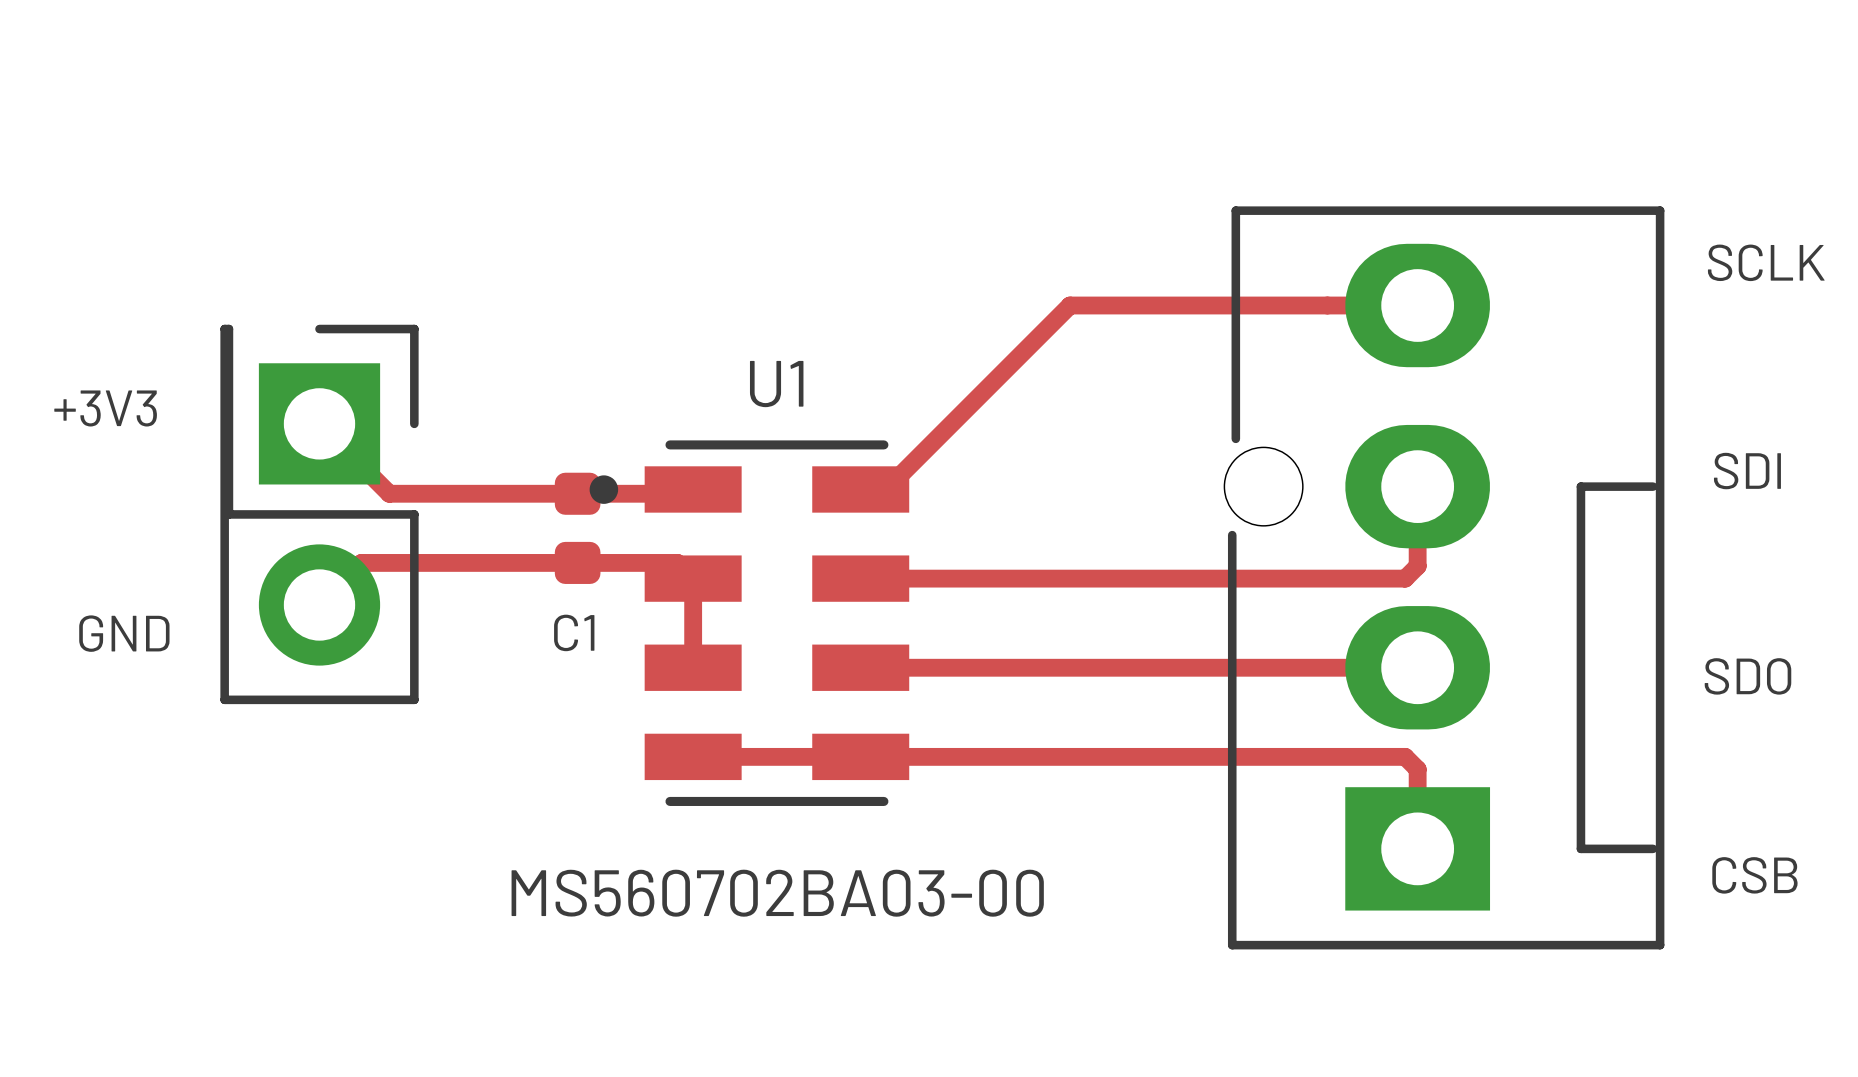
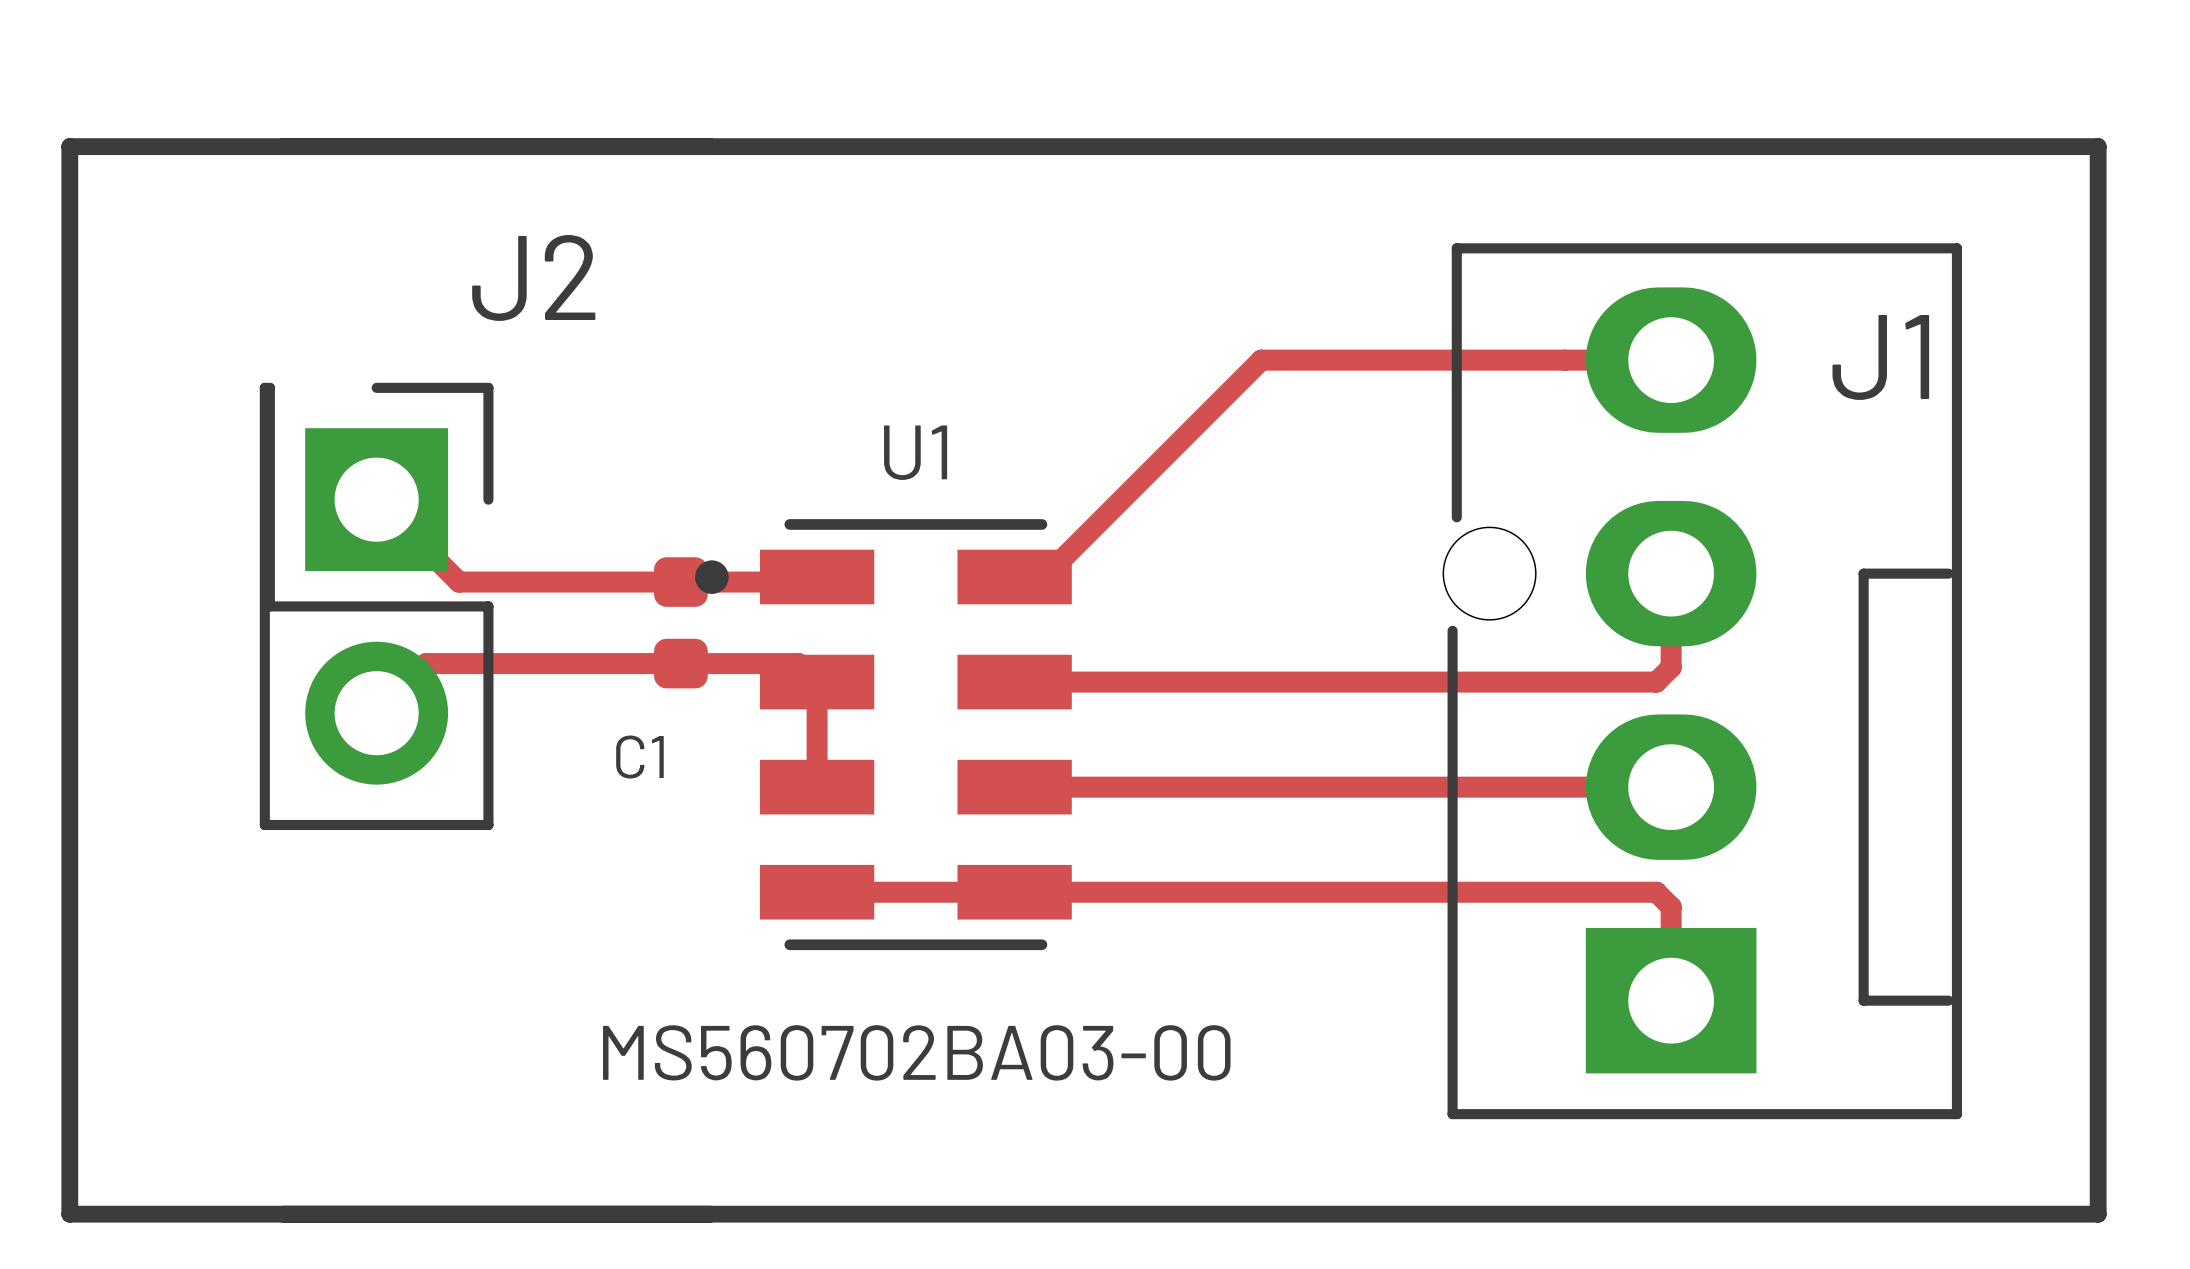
line: none -> (69, 146) (69, 1214) (2098, 1214) (2098, 146) (69, 146)
J2 name: none -> J2 (533, 277)
text: SCLK (1766, 262) -> none
J1 name: none -> J1 (1880, 357)
text: +3V3 (105, 408) -> none
text: SDI (1747, 471) -> none
C1 name position: C1 (574, 632) -> C1 (639, 757)
text: GND (124, 633) -> none
text: SDO (1747, 676) -> none
text: CSB (1754, 875) -> none

